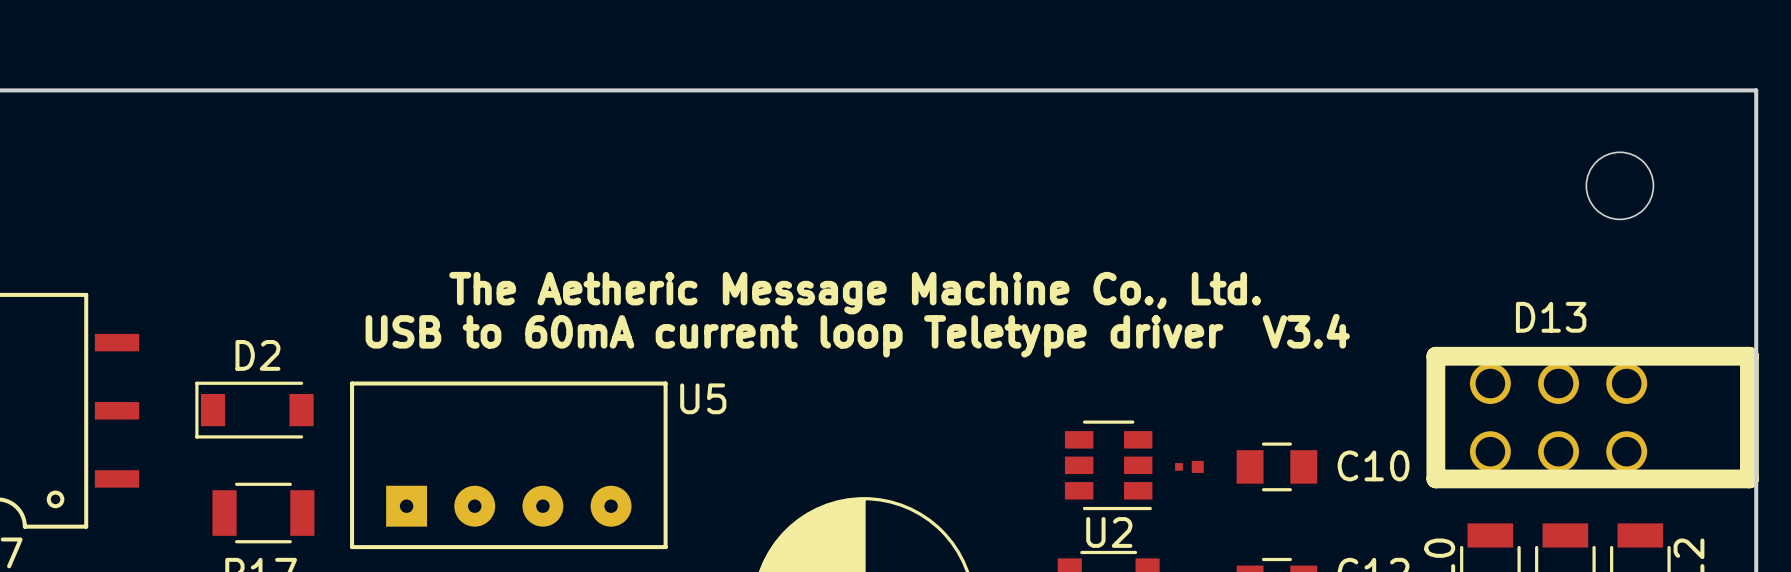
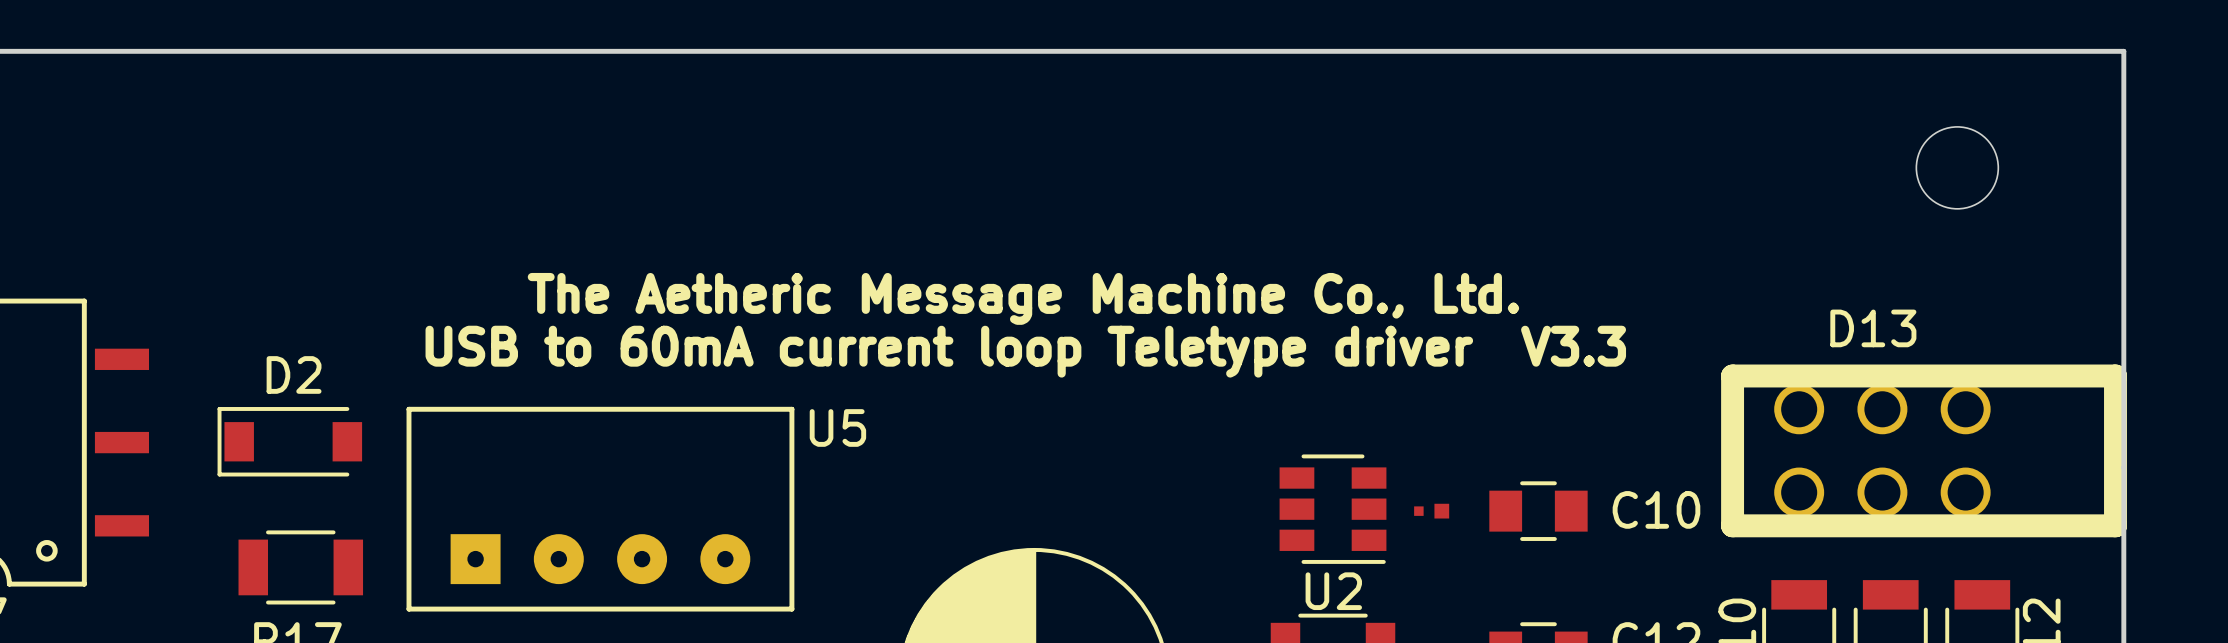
text: USB to 60mA current loop Teletype driver V3.4 (857, 335) -> USB to 60mA current loop Teletype driver V3.3 (1025, 351)

